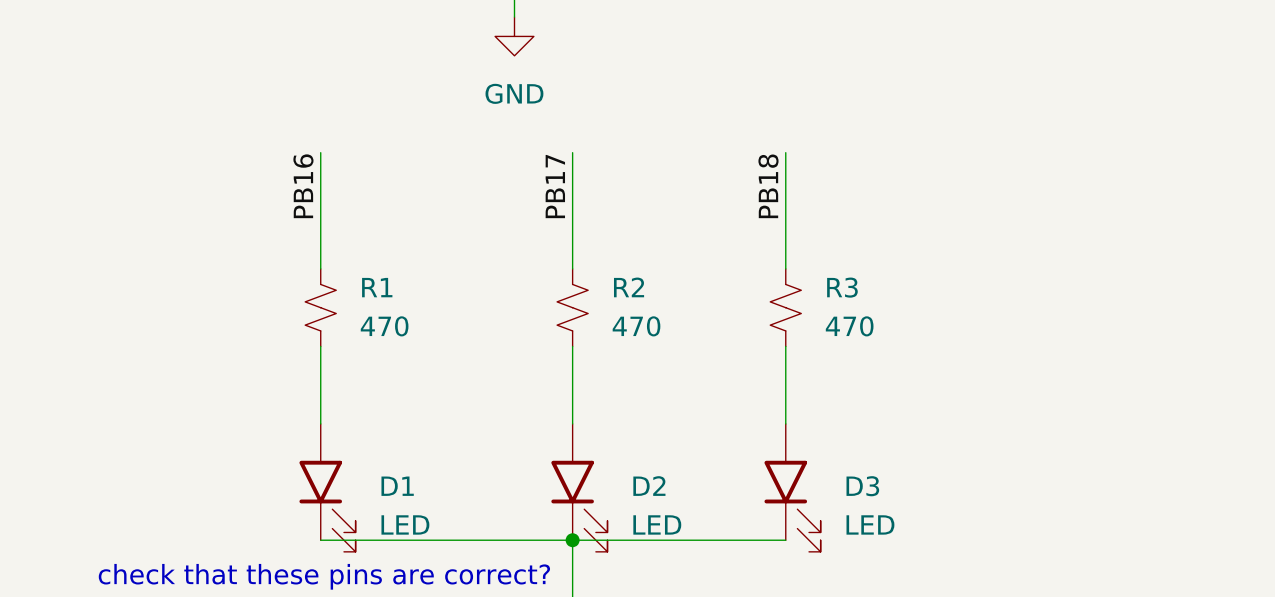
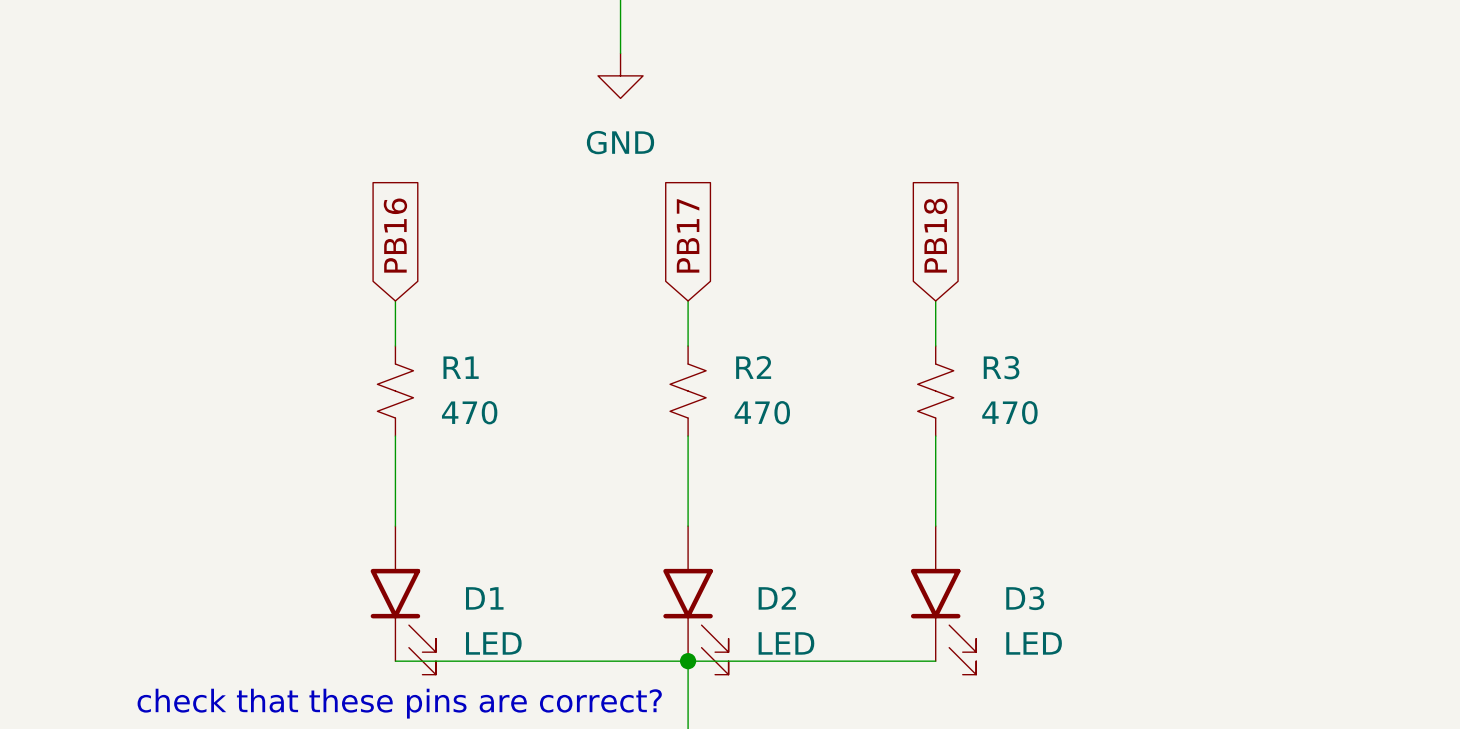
wire: (320, 152) (320, 230) -> none
wire: (572, 152) (572, 230) -> none
wire: (785, 152) (785, 230) -> none
global label: none -> PB16 (395, 235)
global label: none -> PB18 (935, 235)
global label: none -> PB17 (688, 235)
label: PB16 (303, 186) -> none
label: PB17 (555, 186) -> none
label: PB18 (768, 186) -> none

